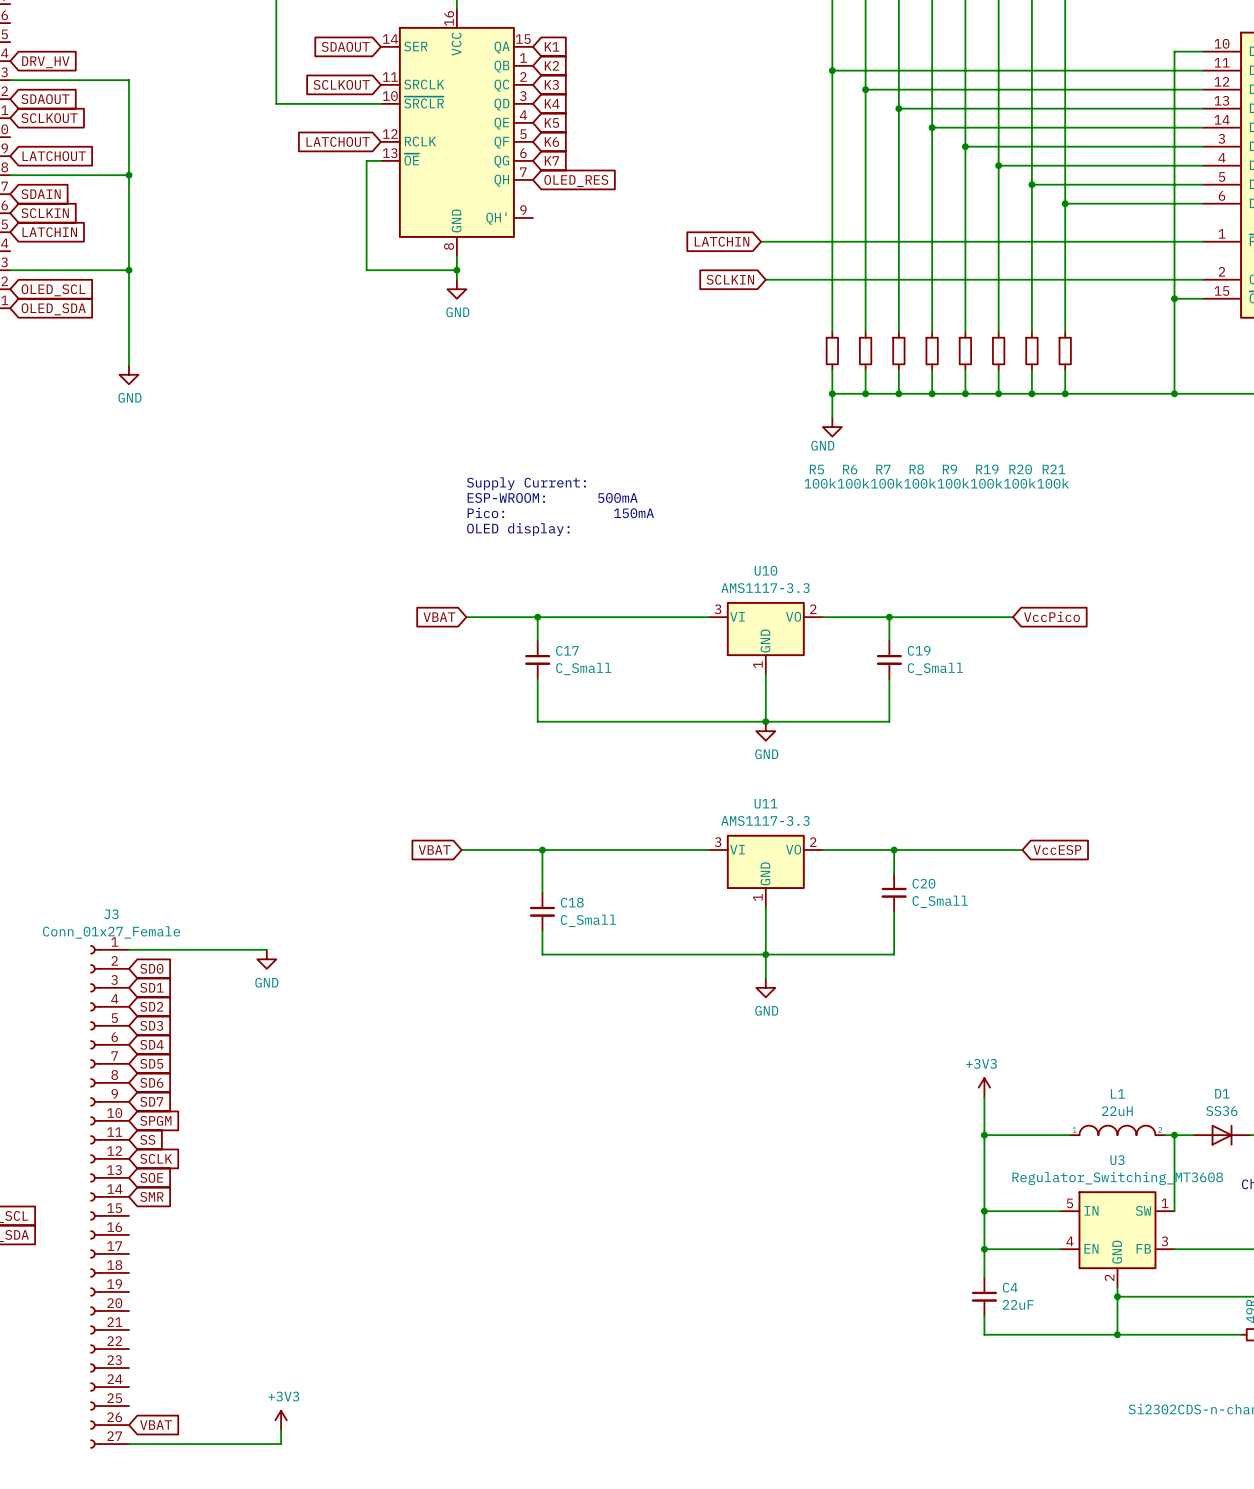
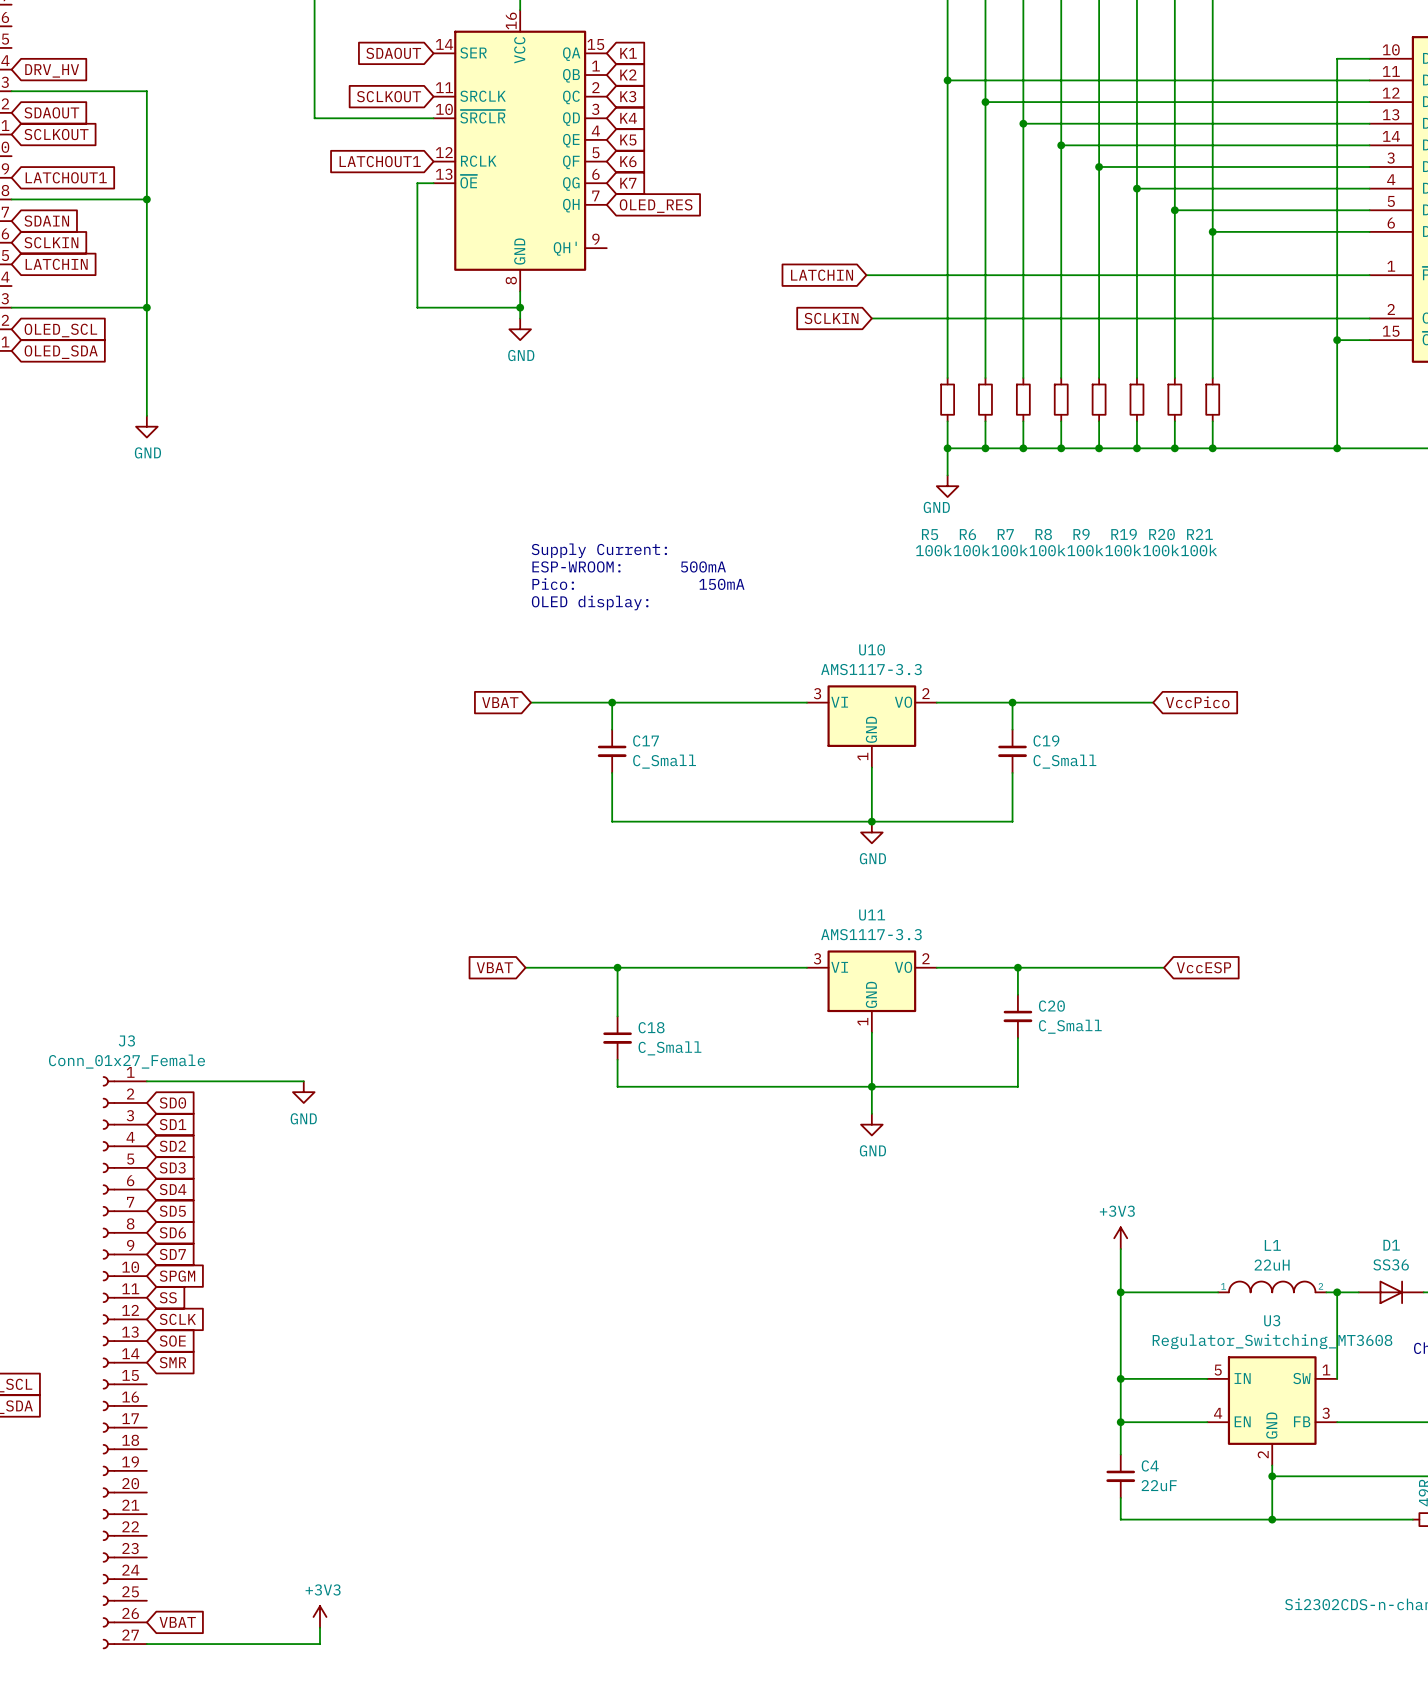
global label: LATCHOUT (338, 141) -> LATCHOUT1 (380, 161)
global label: LATCHOUT (54, 156) -> LATCHOUT1 (66, 177)

